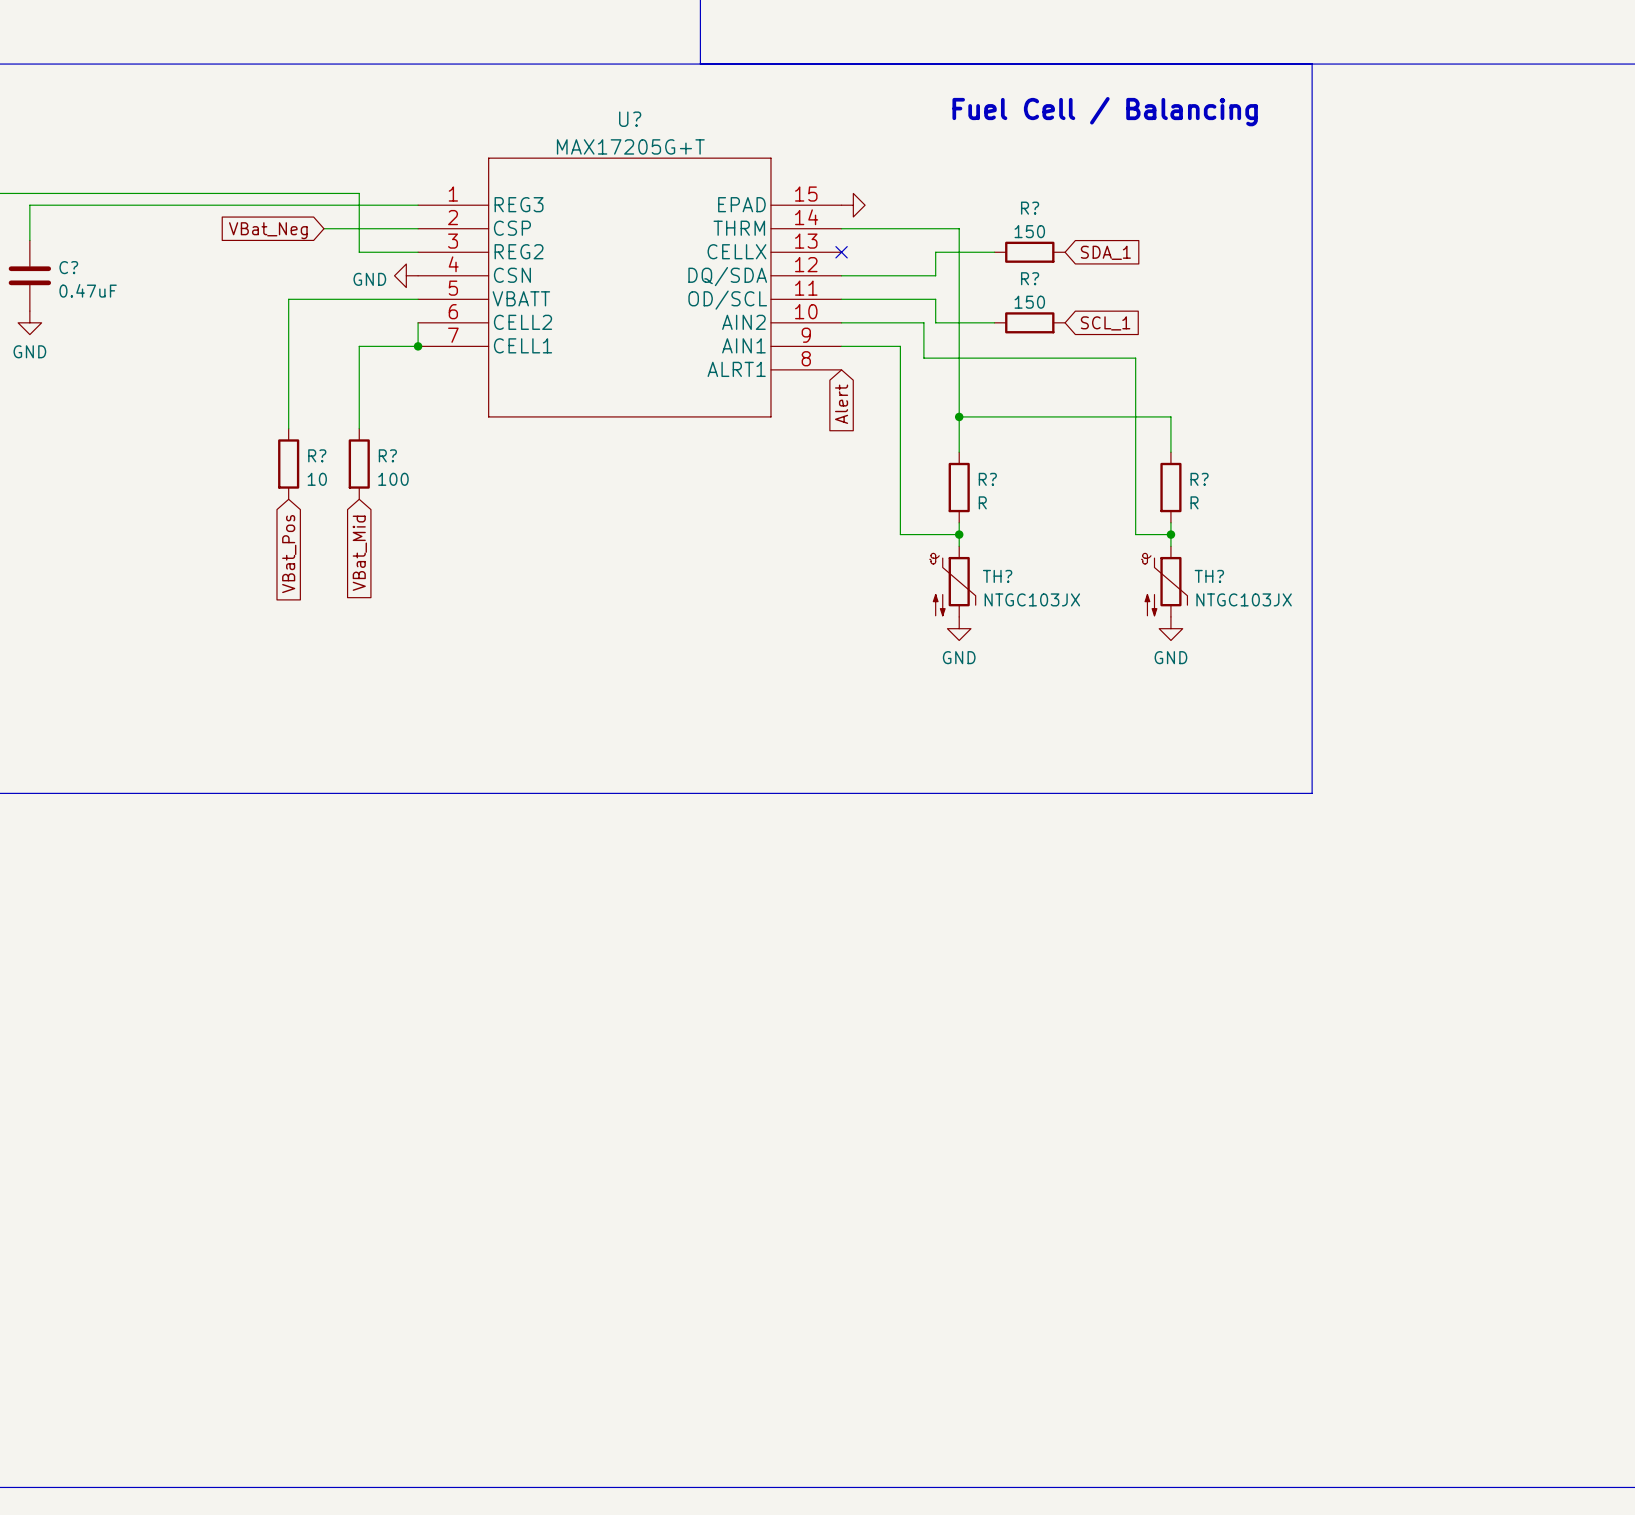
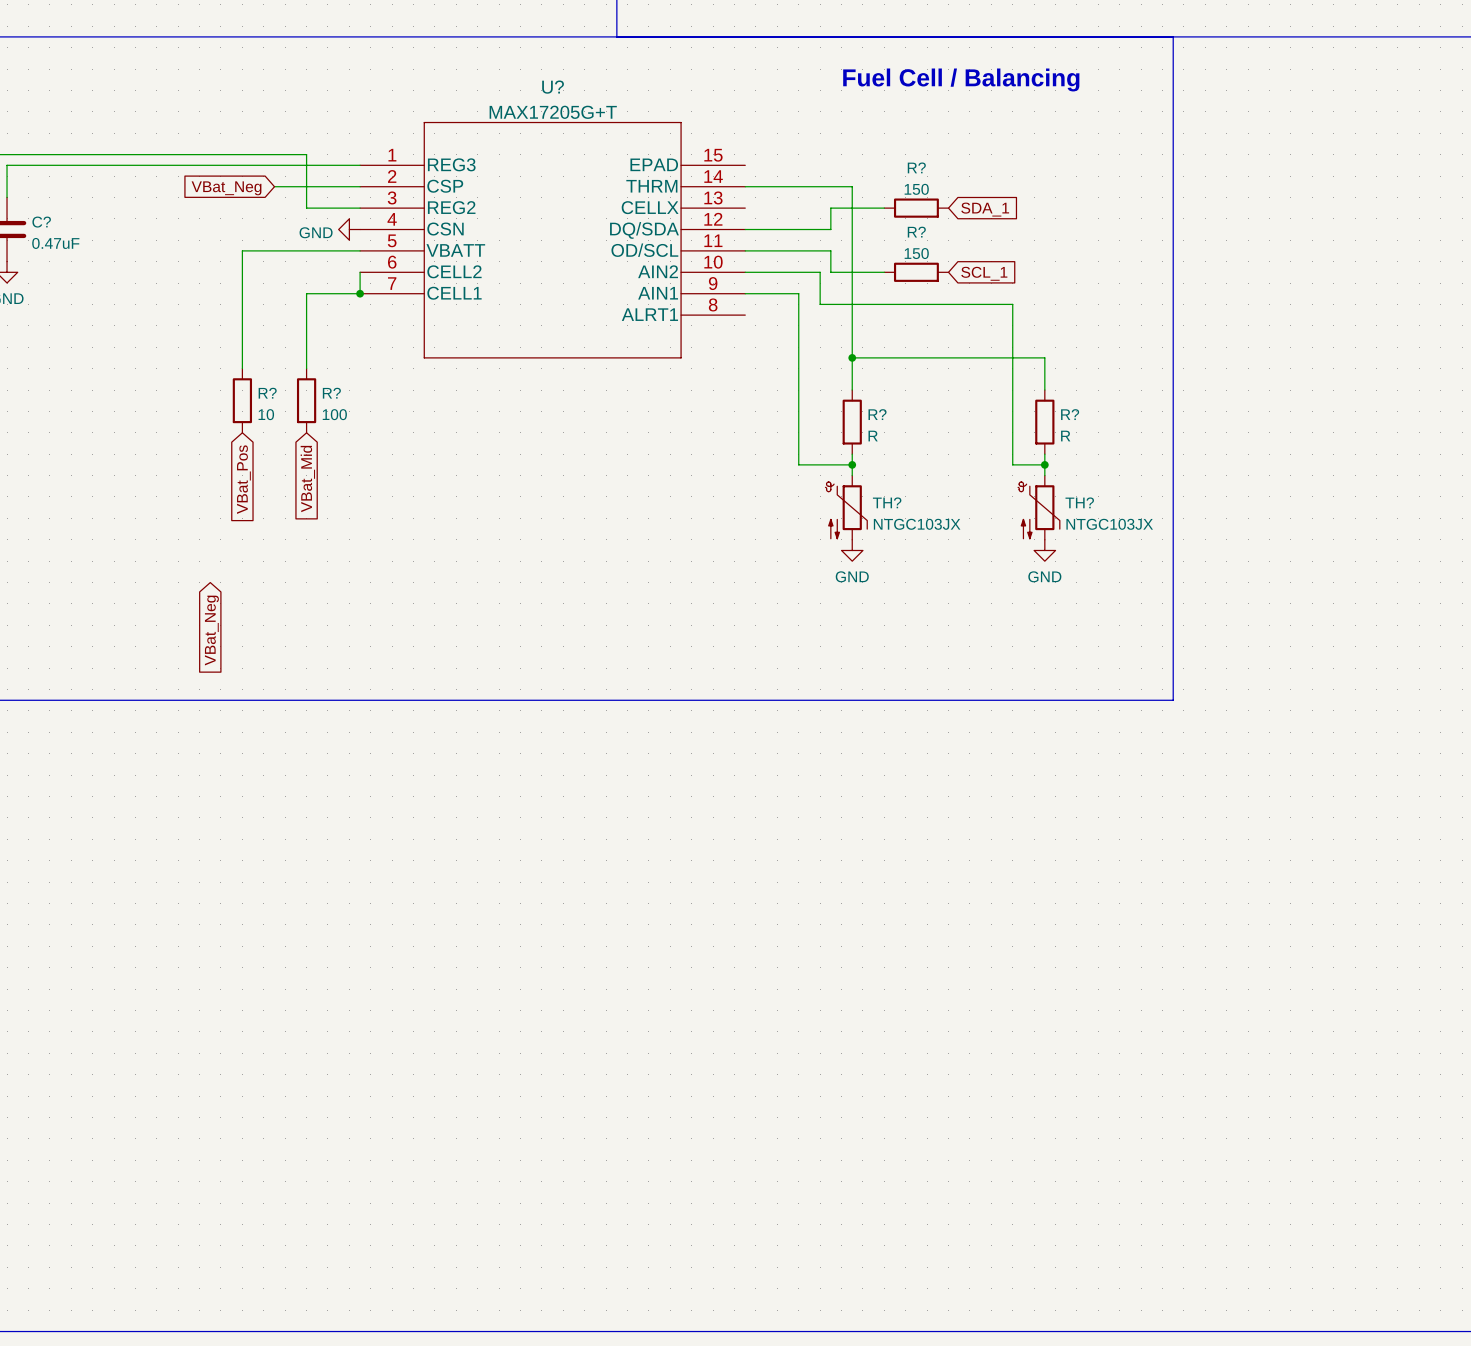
power symbol: (853, 205) -> none
no-connect mark: (841, 252) -> none
global label: Alert (841, 404) -> none
global label: none -> VBat_Neg (211, 630)

